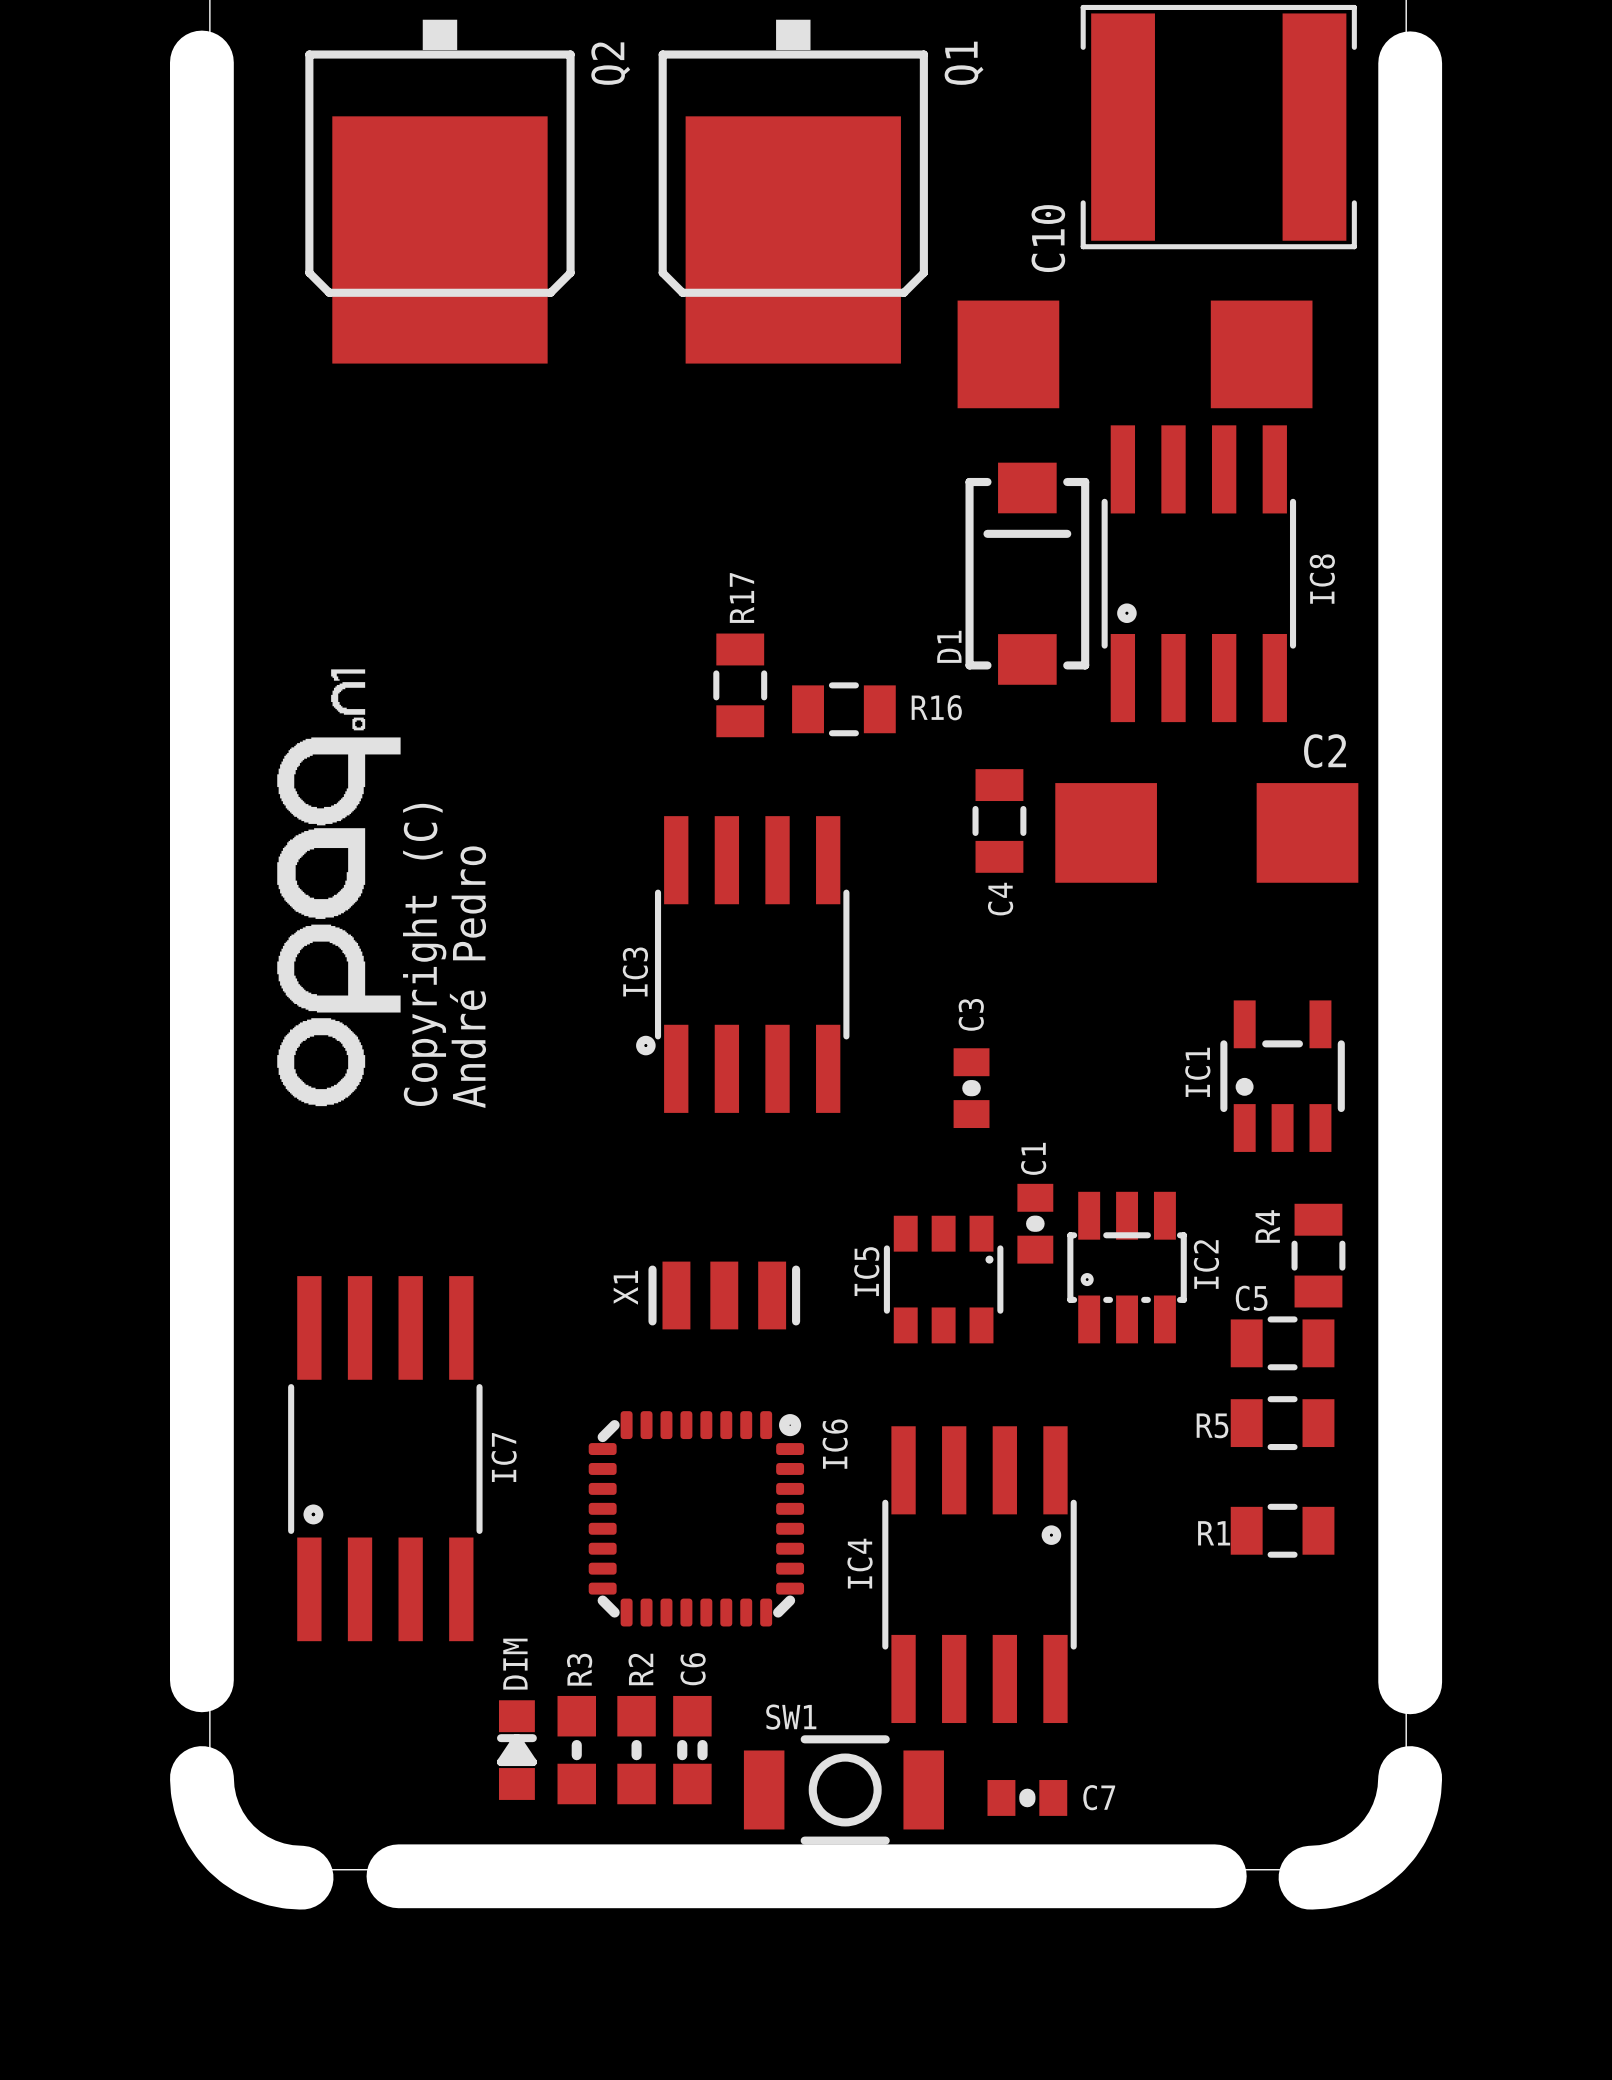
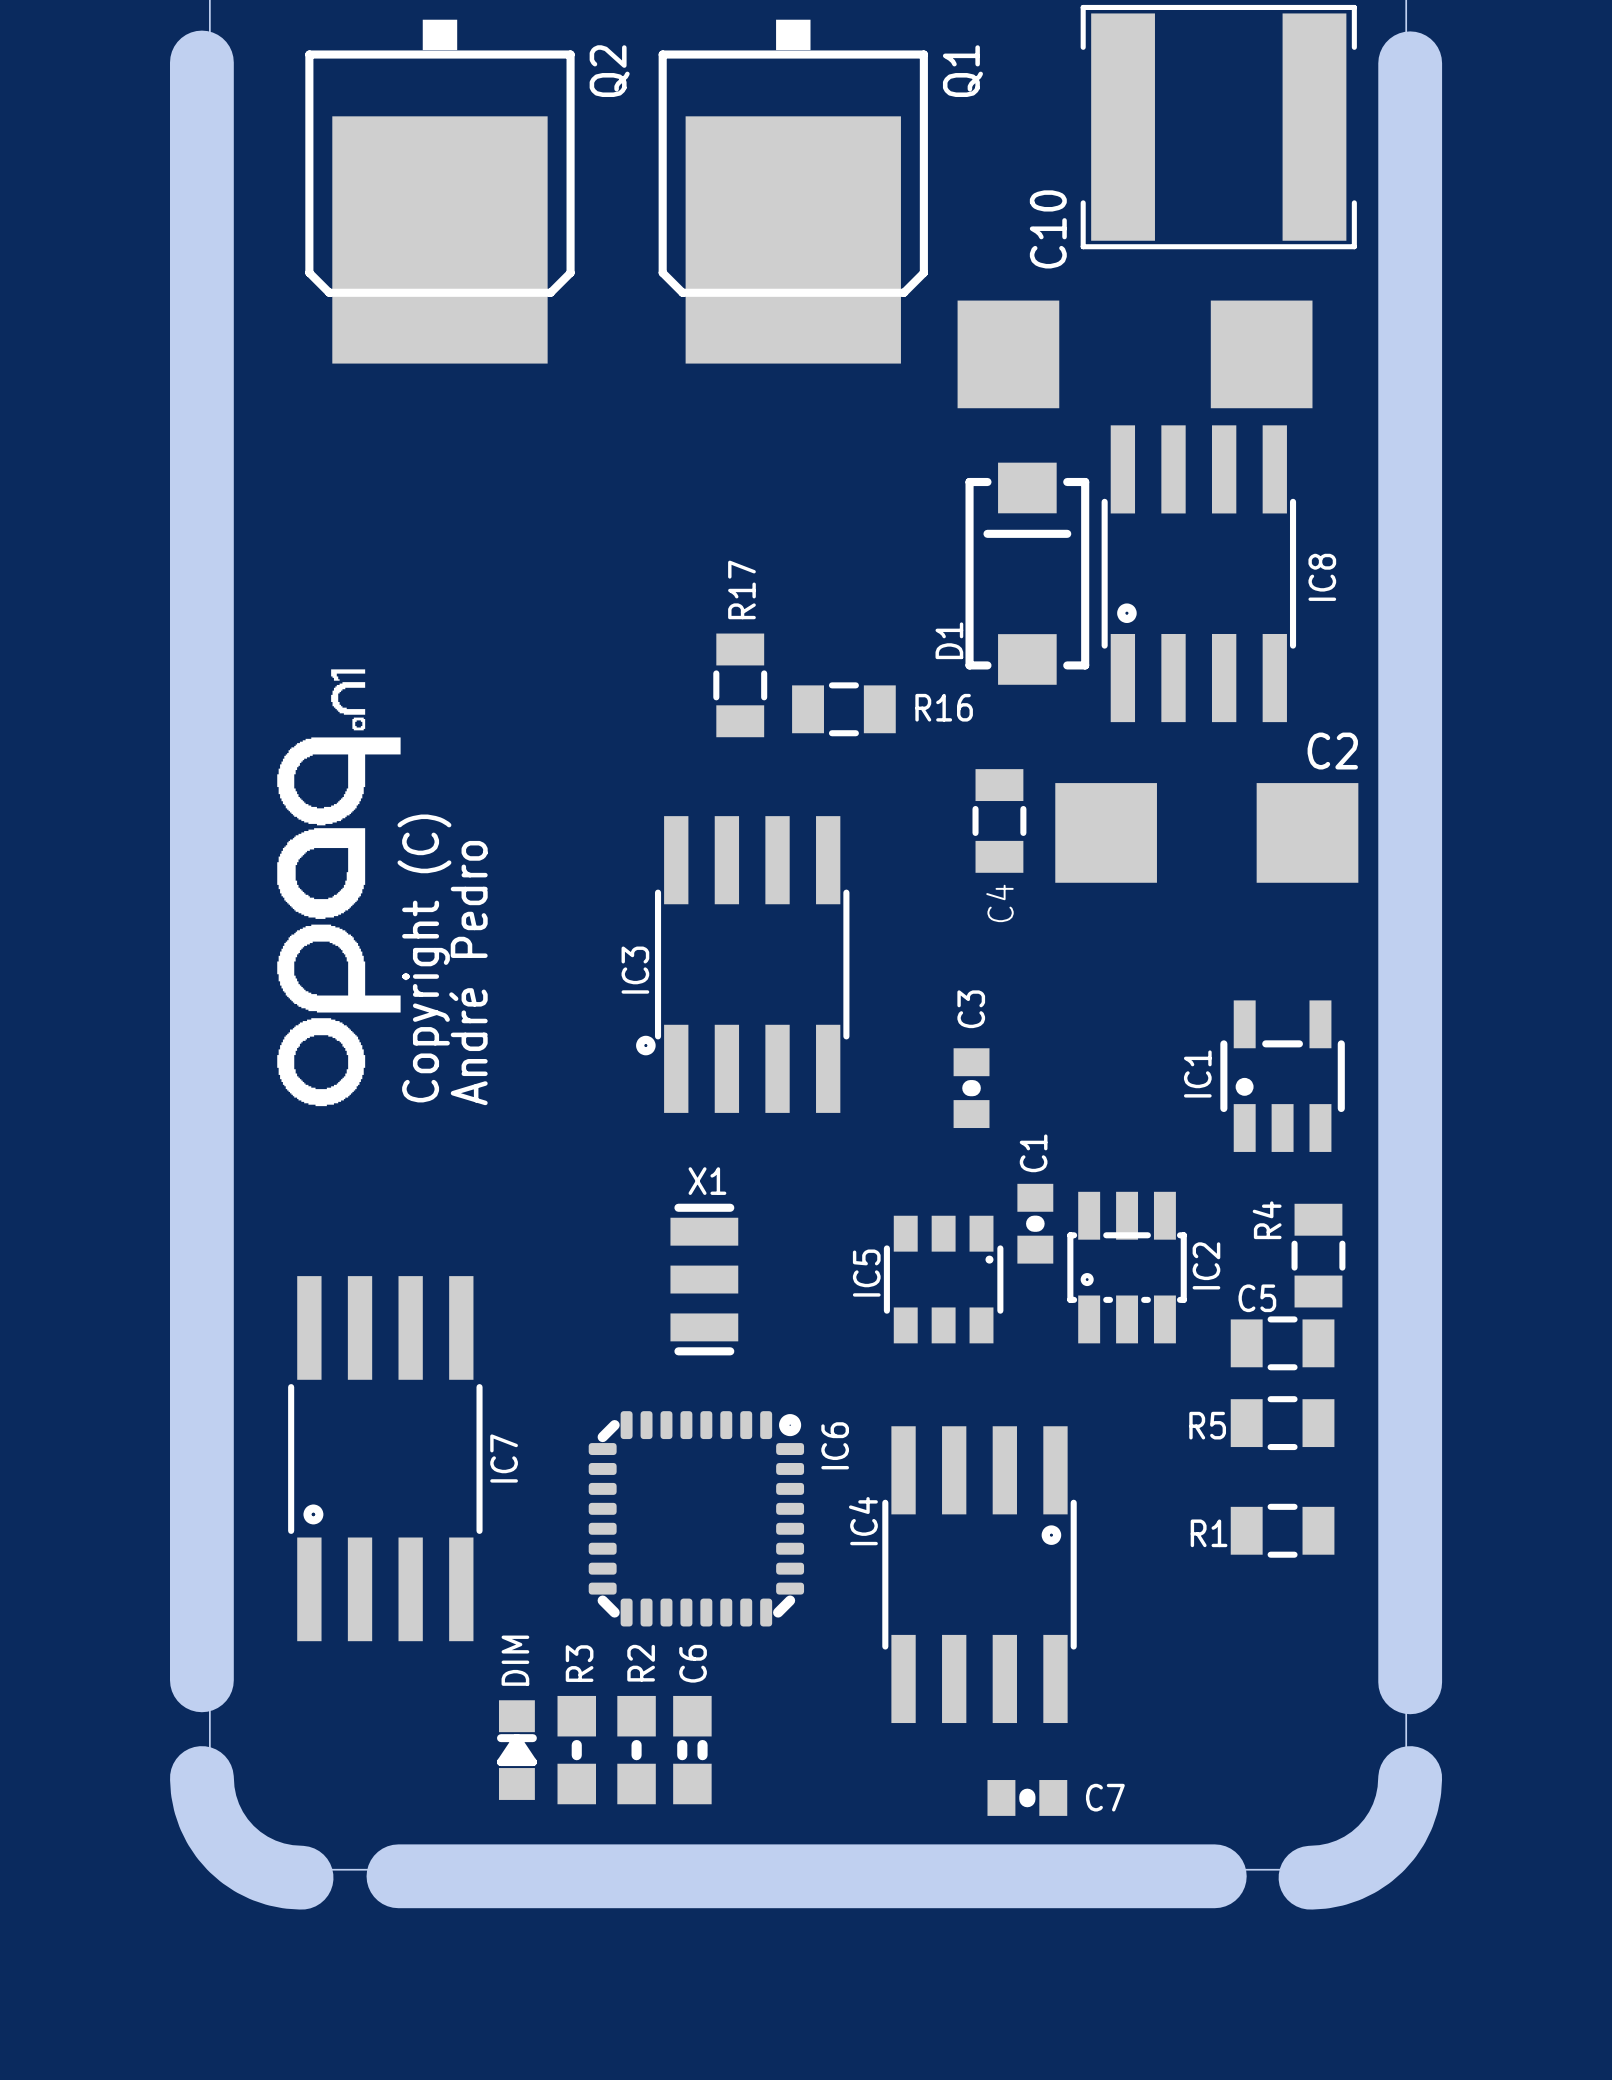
X1 rotation: 0° (724, 1295) -> 90° clockwise (704, 1279)
IC4 name position: IC4 (860, 1563) -> IC4 (863, 1521)
SW1: (843, 1789) -> none

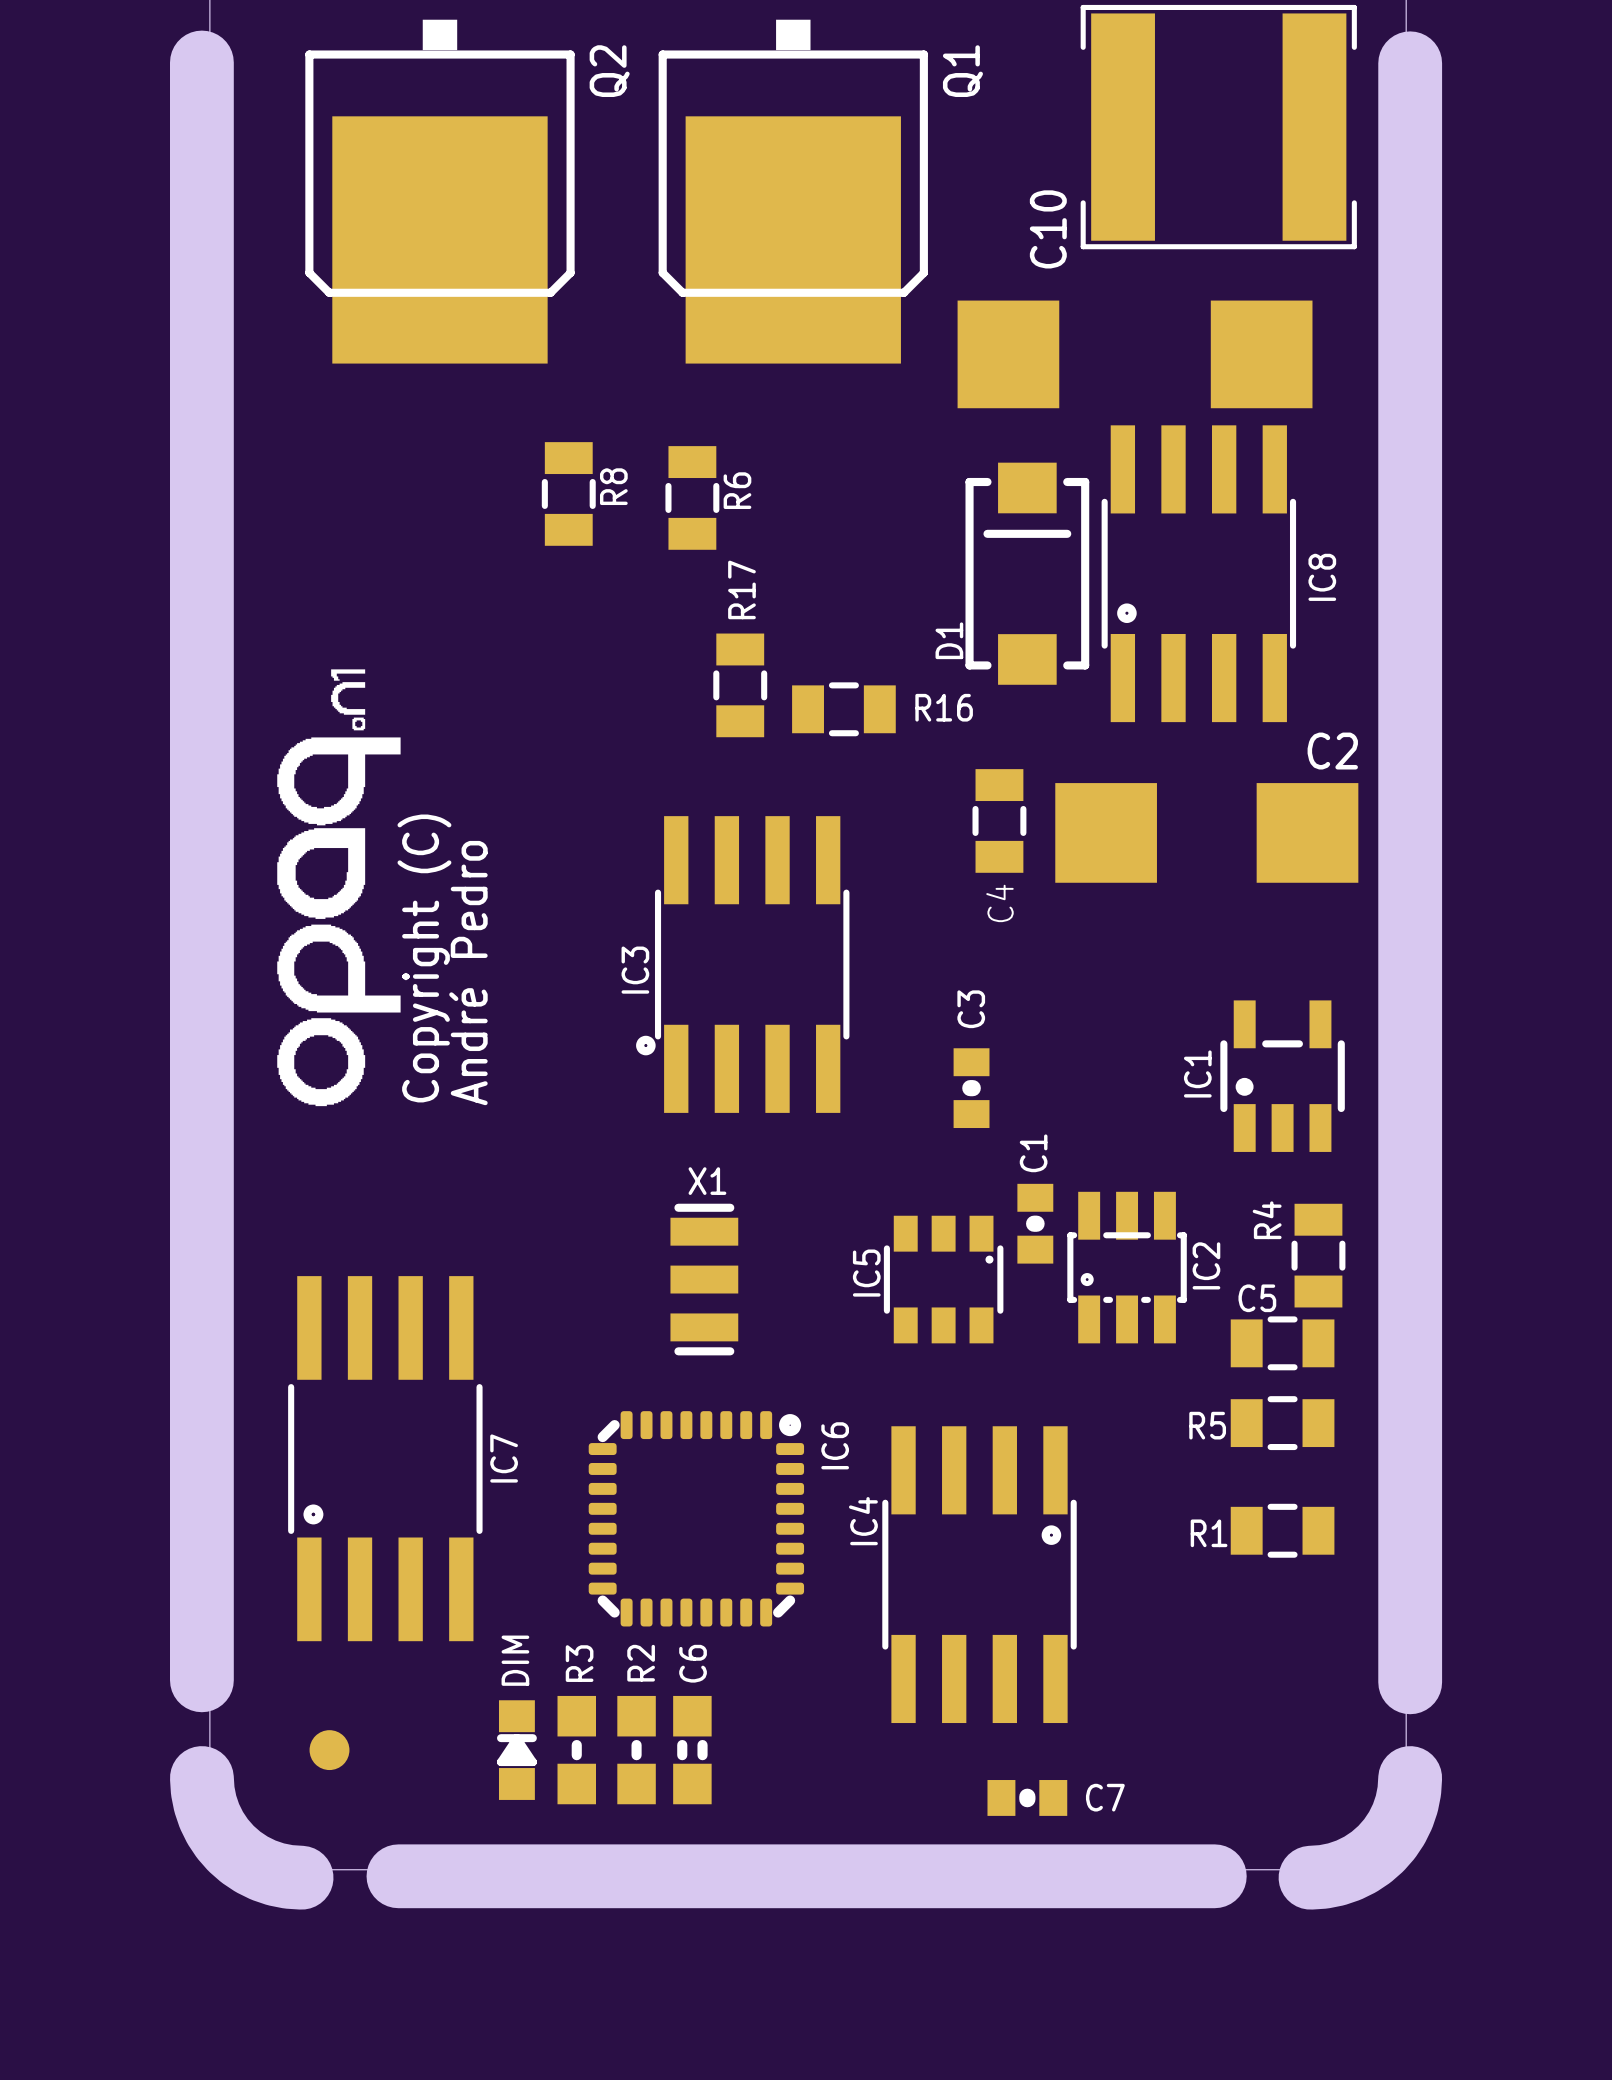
R8: none -> (568, 493)
R6: none -> (692, 497)
part: none -> (329, 1750)

